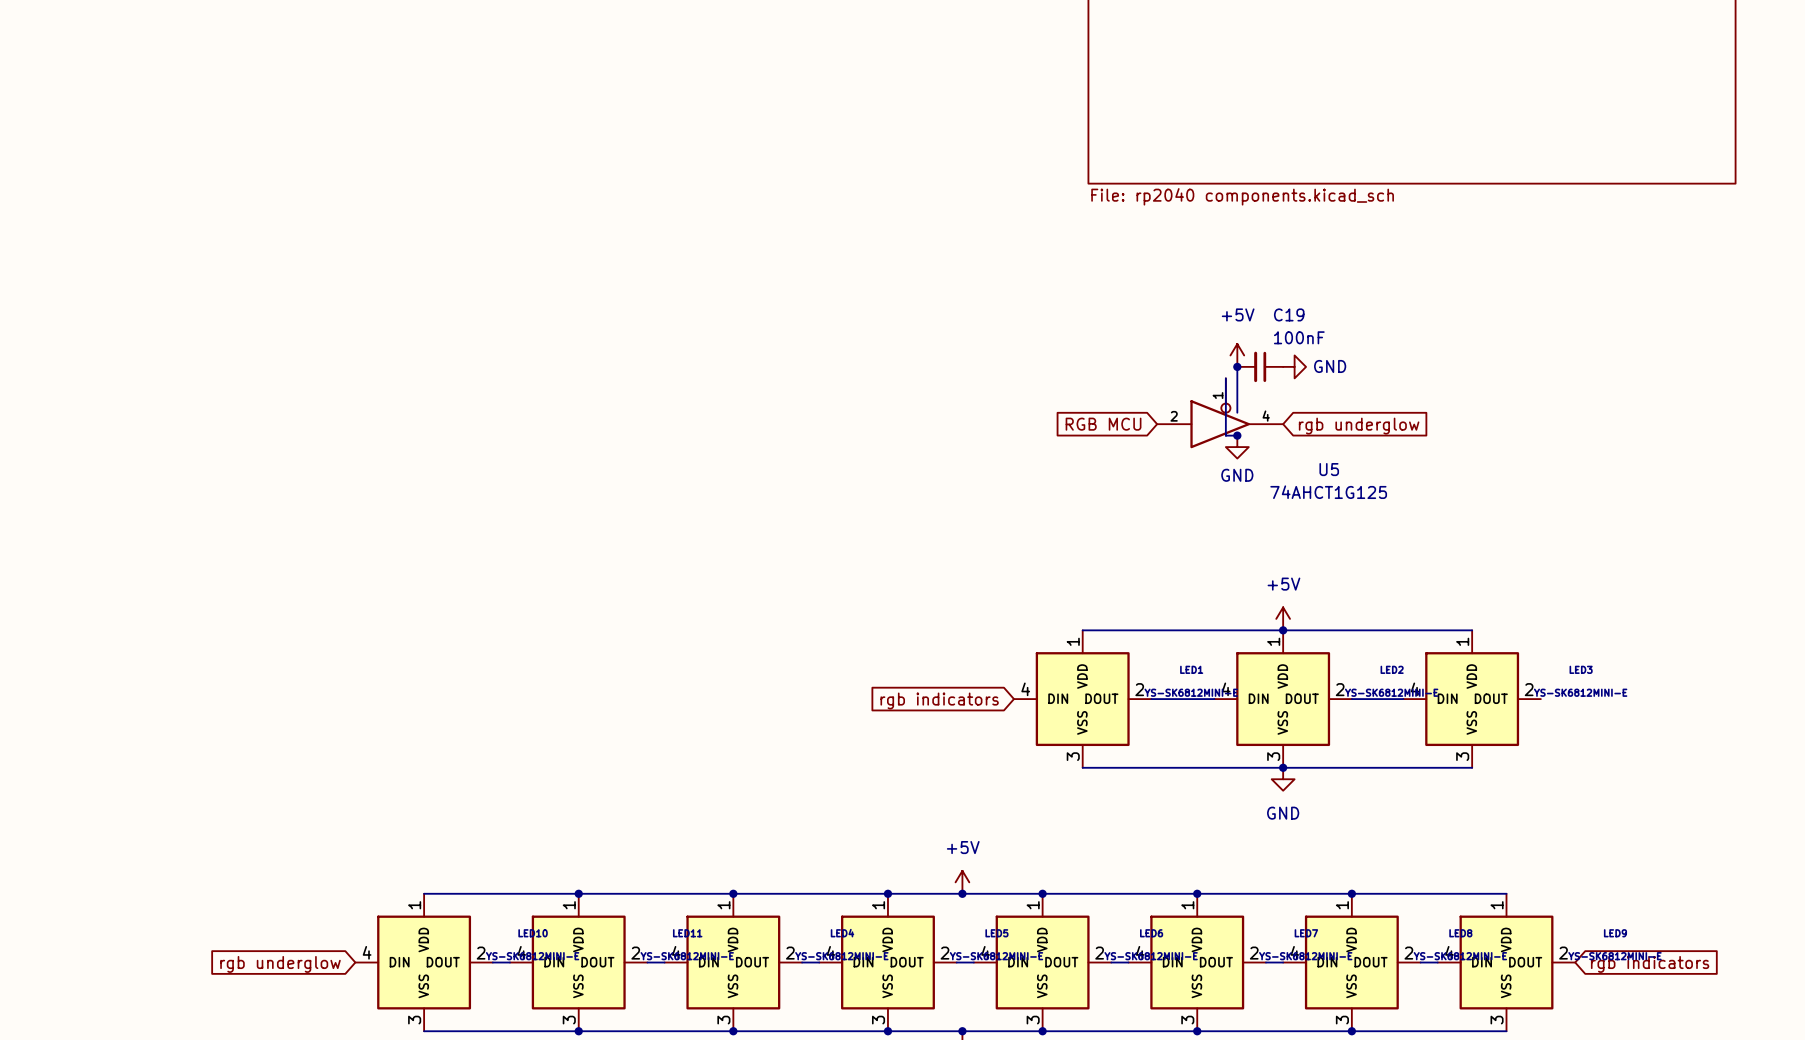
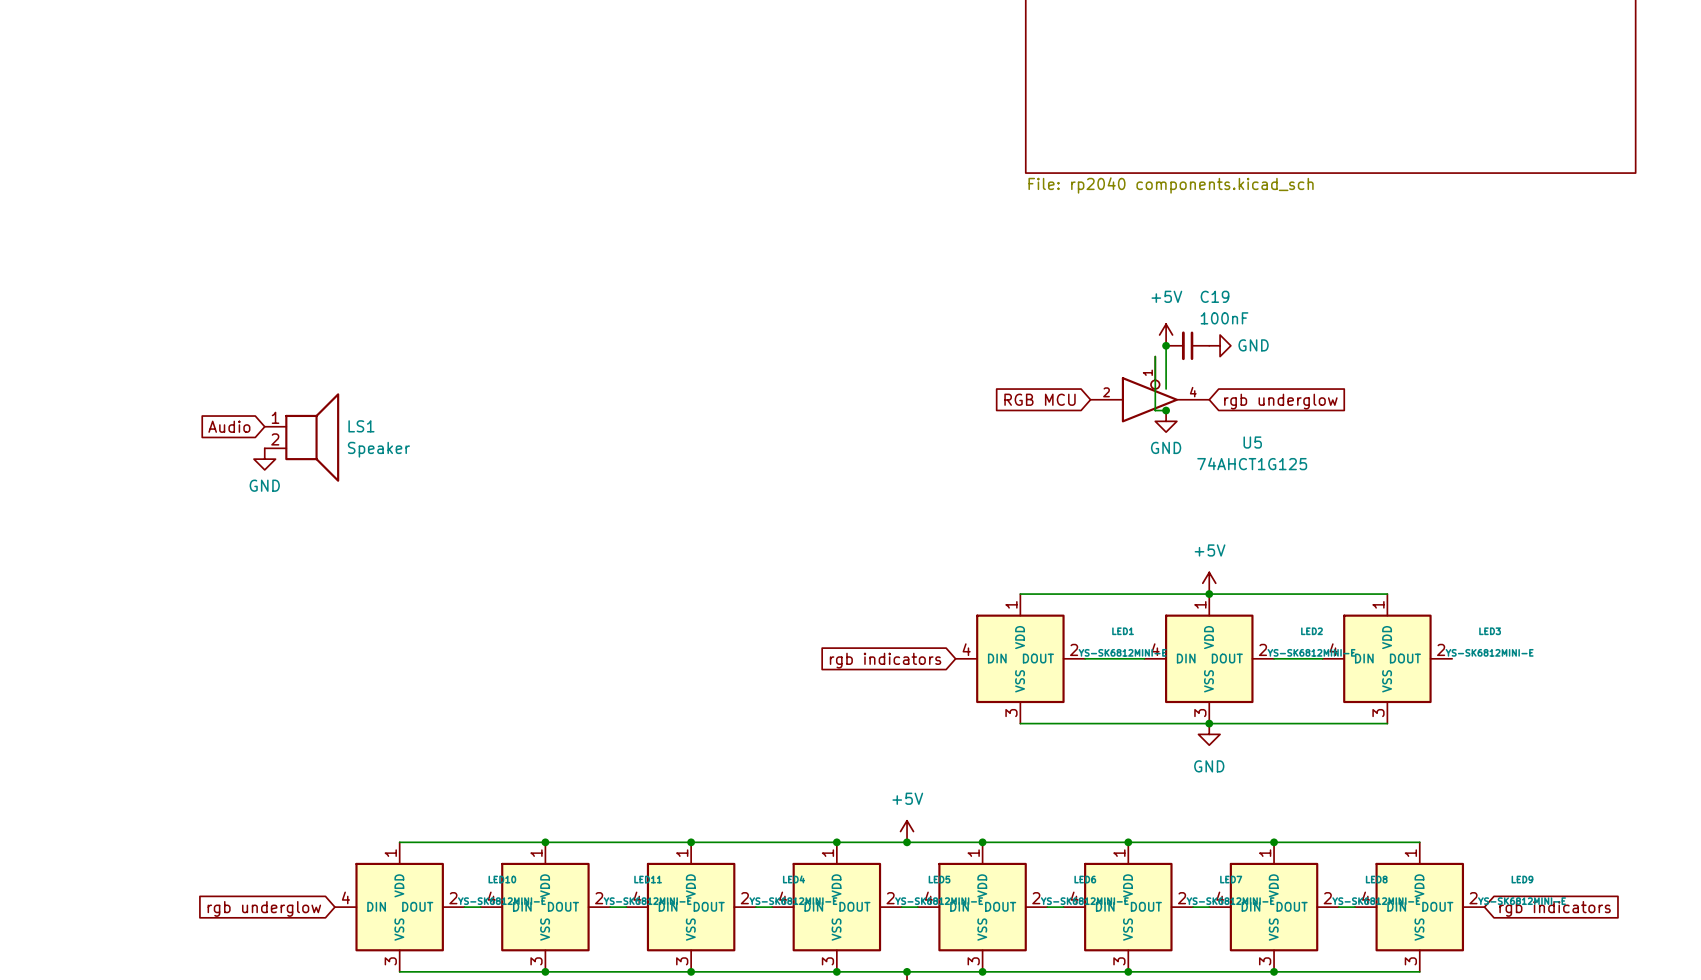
global label: none -> Audio (229, 426)
LS1: none -> Speaker (301, 437)
power symbol: none -> GND (264, 459)

